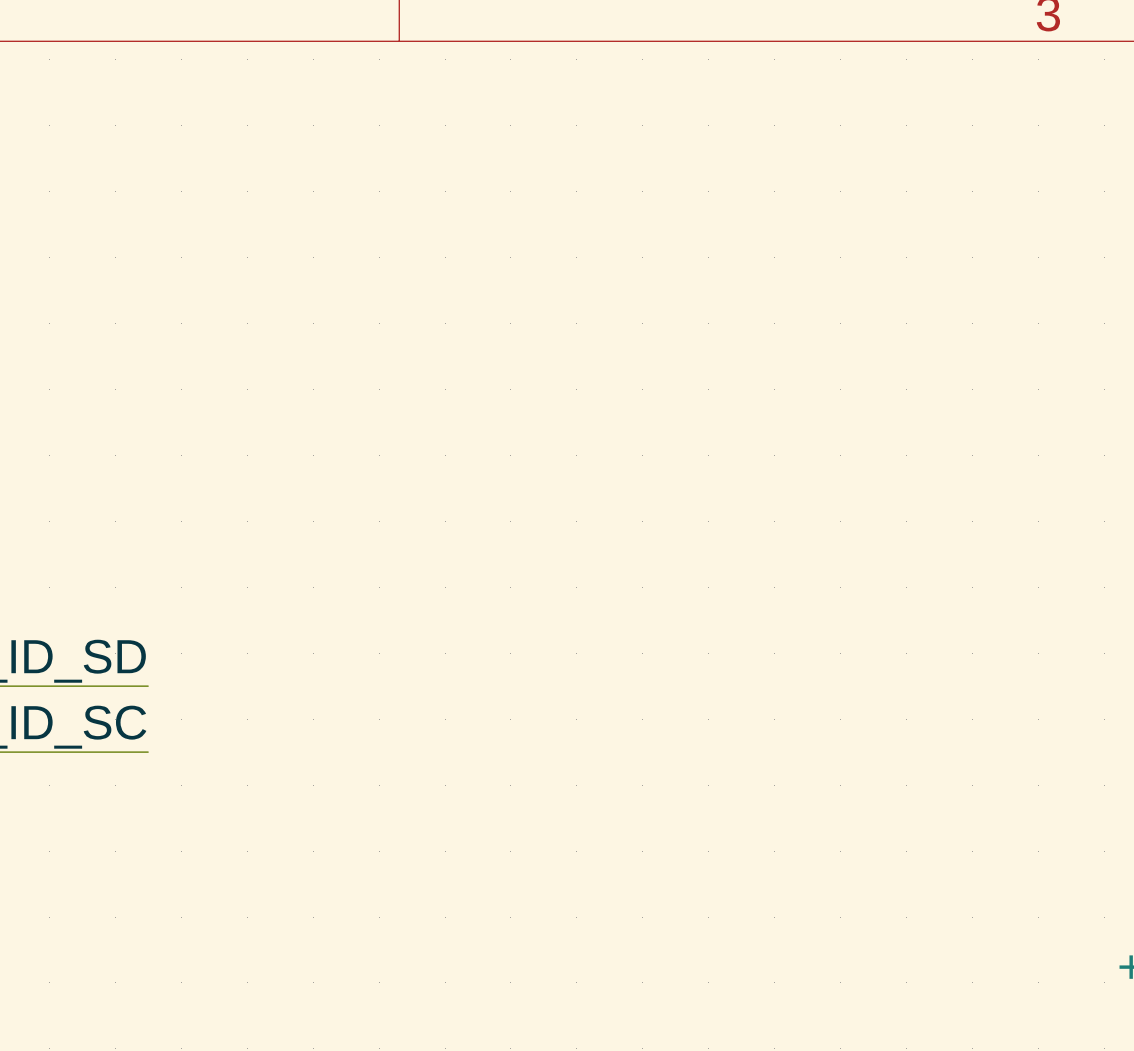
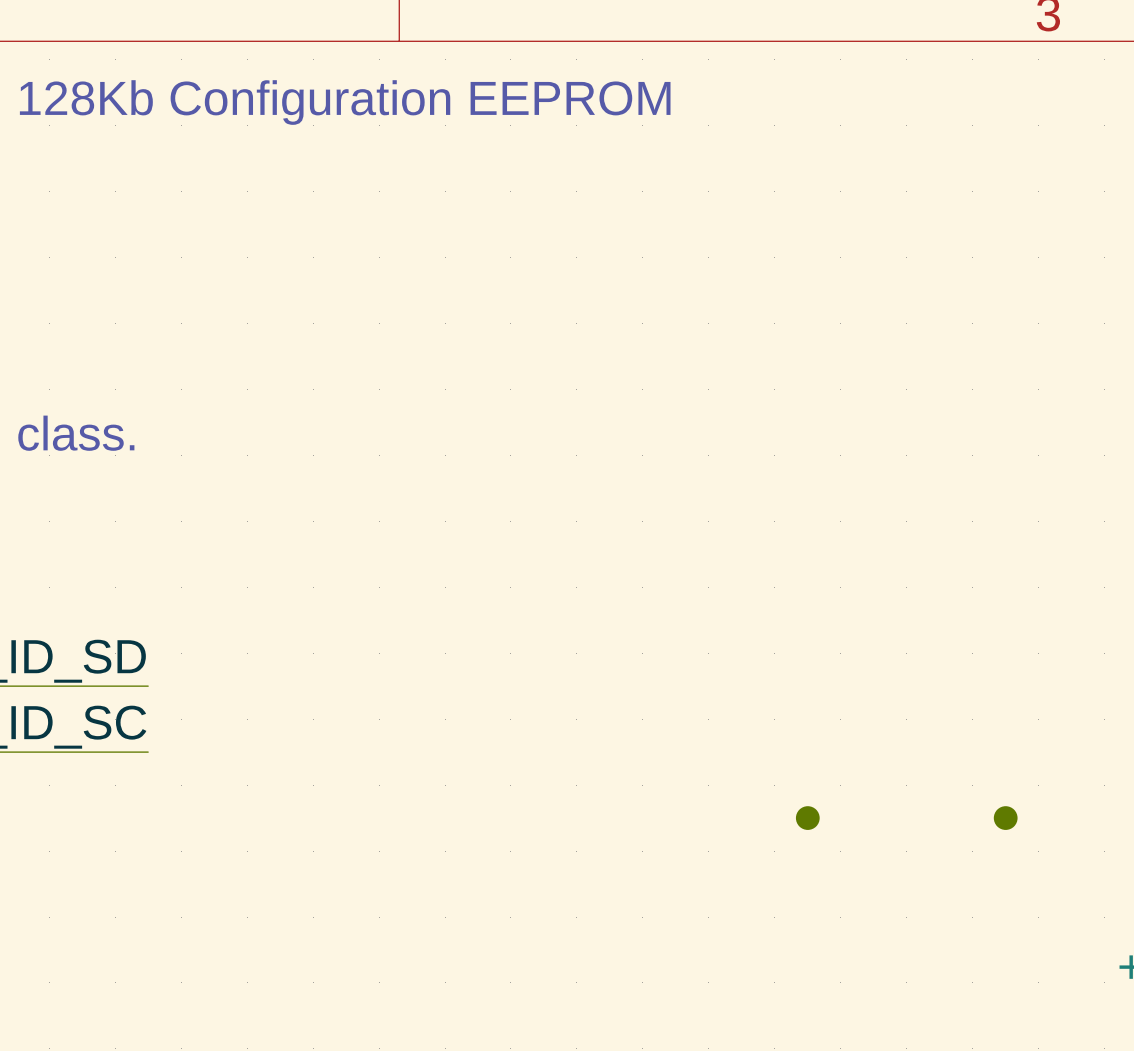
text: none -> 128Kb Configuration EEPROM (345, 102)
text: none -> class. (76, 433)
junction: none -> (807, 818)
junction: none -> (1005, 818)

